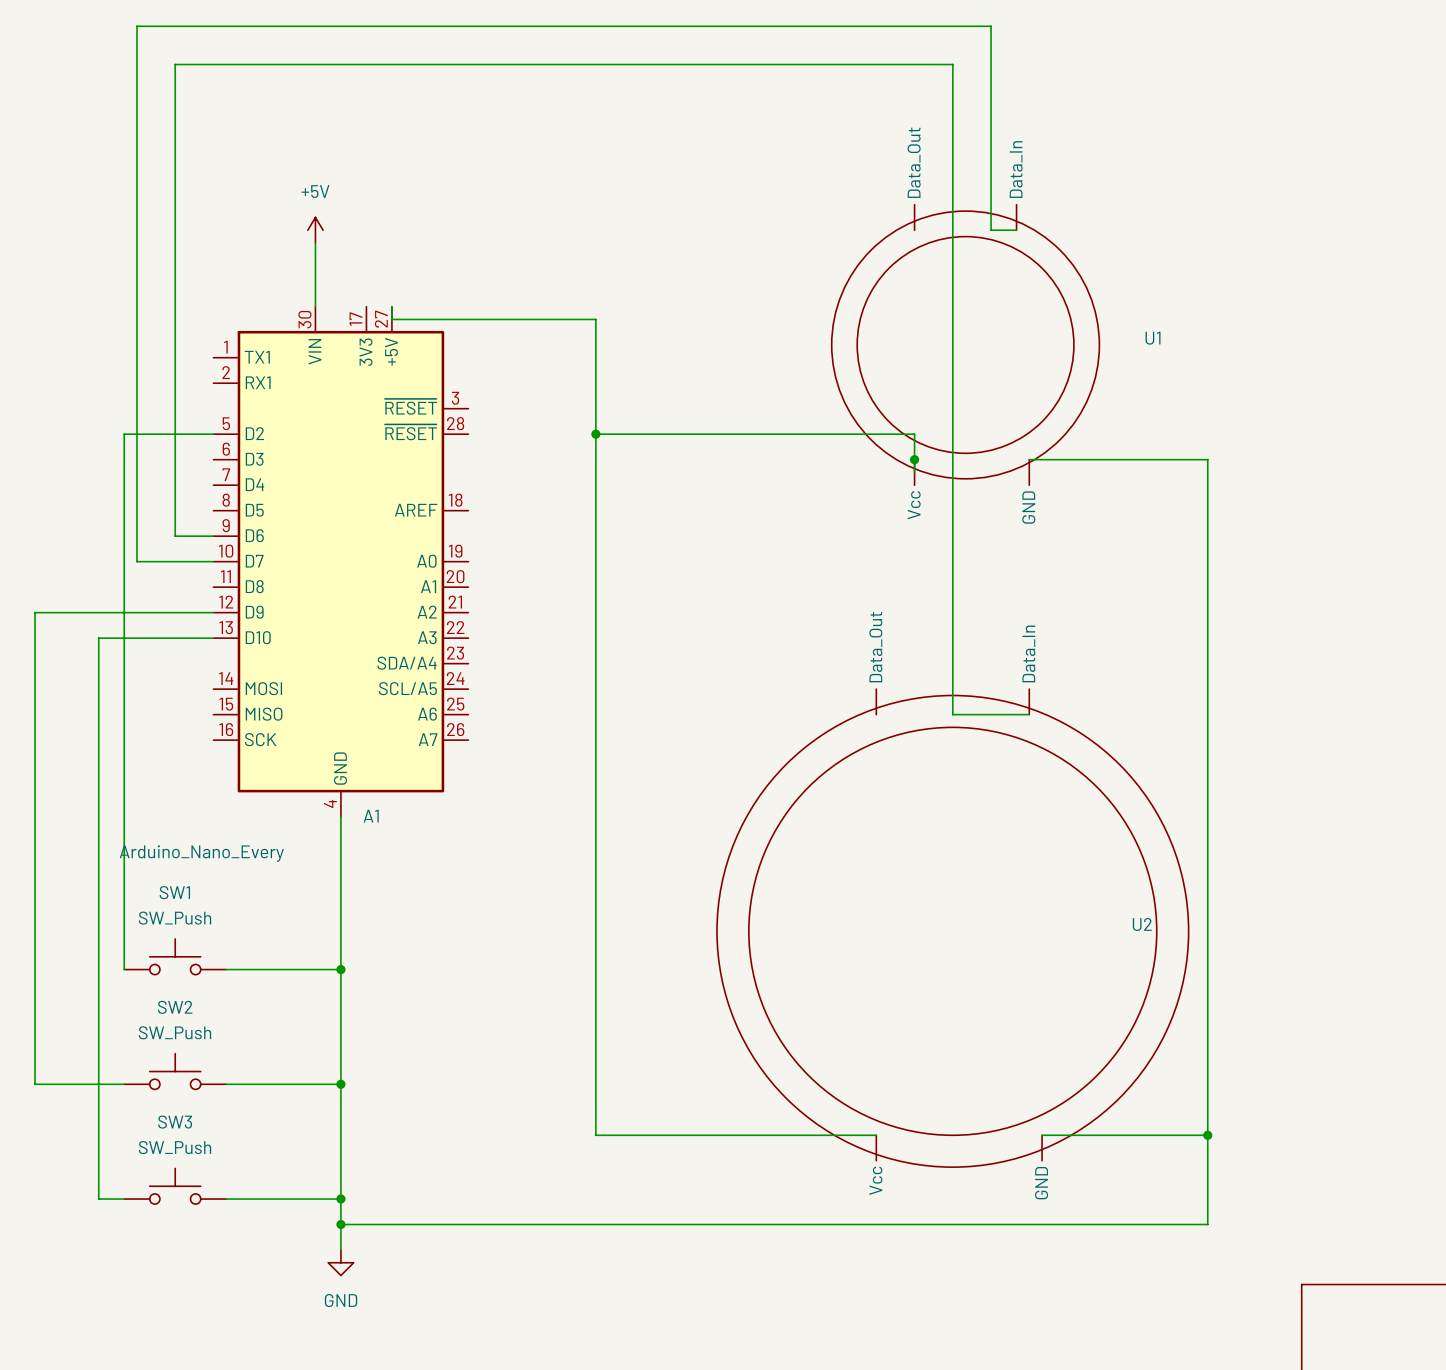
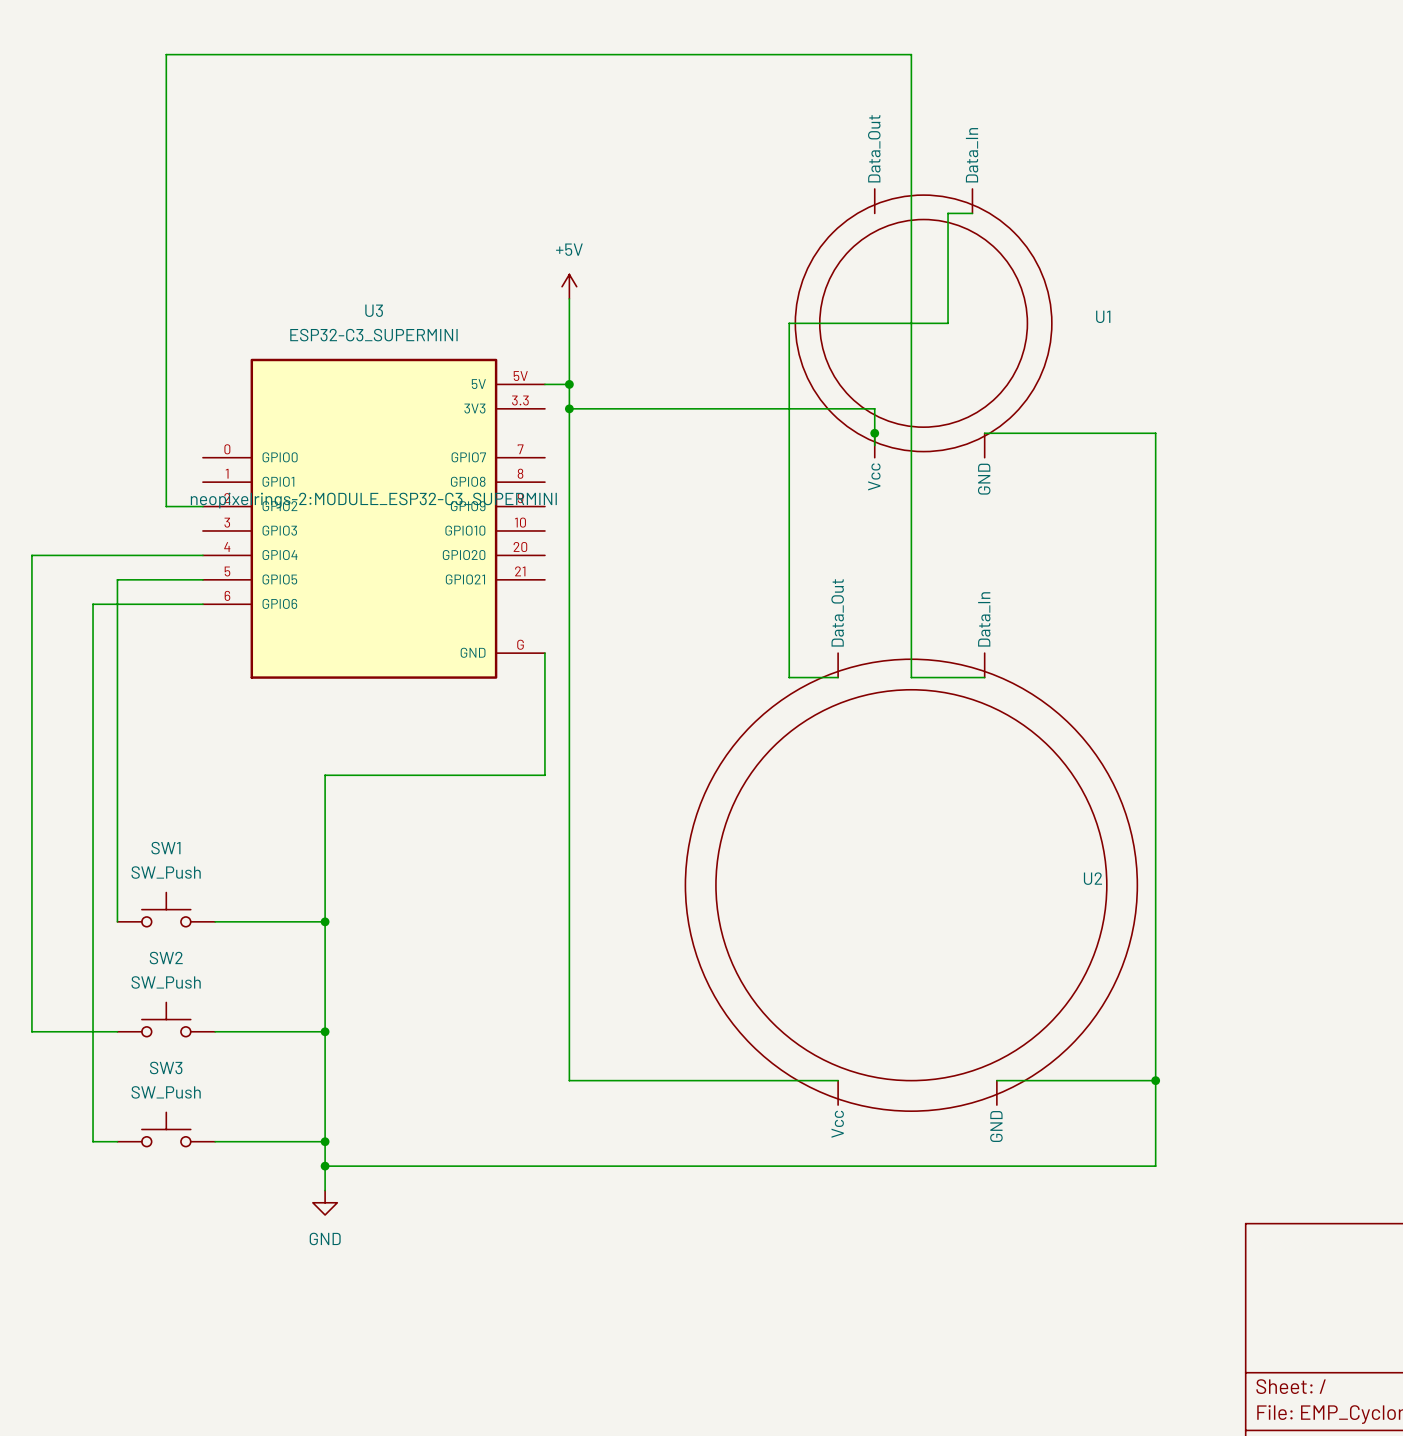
power symbol: +5V (315, 230) -> none
wire: (991, 230) (991, 26) (136, 26) (136, 561) (213, 561) -> (948, 213) (948, 323) (789, 323) (789, 677) (838, 677)
wire: (315, 242) (315, 306) -> none
wire: (391, 306) (391, 319) (595, 319) -> none
power symbol: none -> +5V (569, 286)
wire: none -> (544, 384) (569, 384)
junction: none -> (569, 384)
wire: (213, 434) (124, 434) (124, 612) (35, 612) -> (202, 555) (31, 555) (31, 579)
U3: none -> ESP32-C3_SUPERMINI (373, 518)
A1: Arduino_Nano_Every (340, 561) -> none
wire: none -> (544, 653) (544, 775) (325, 775)

